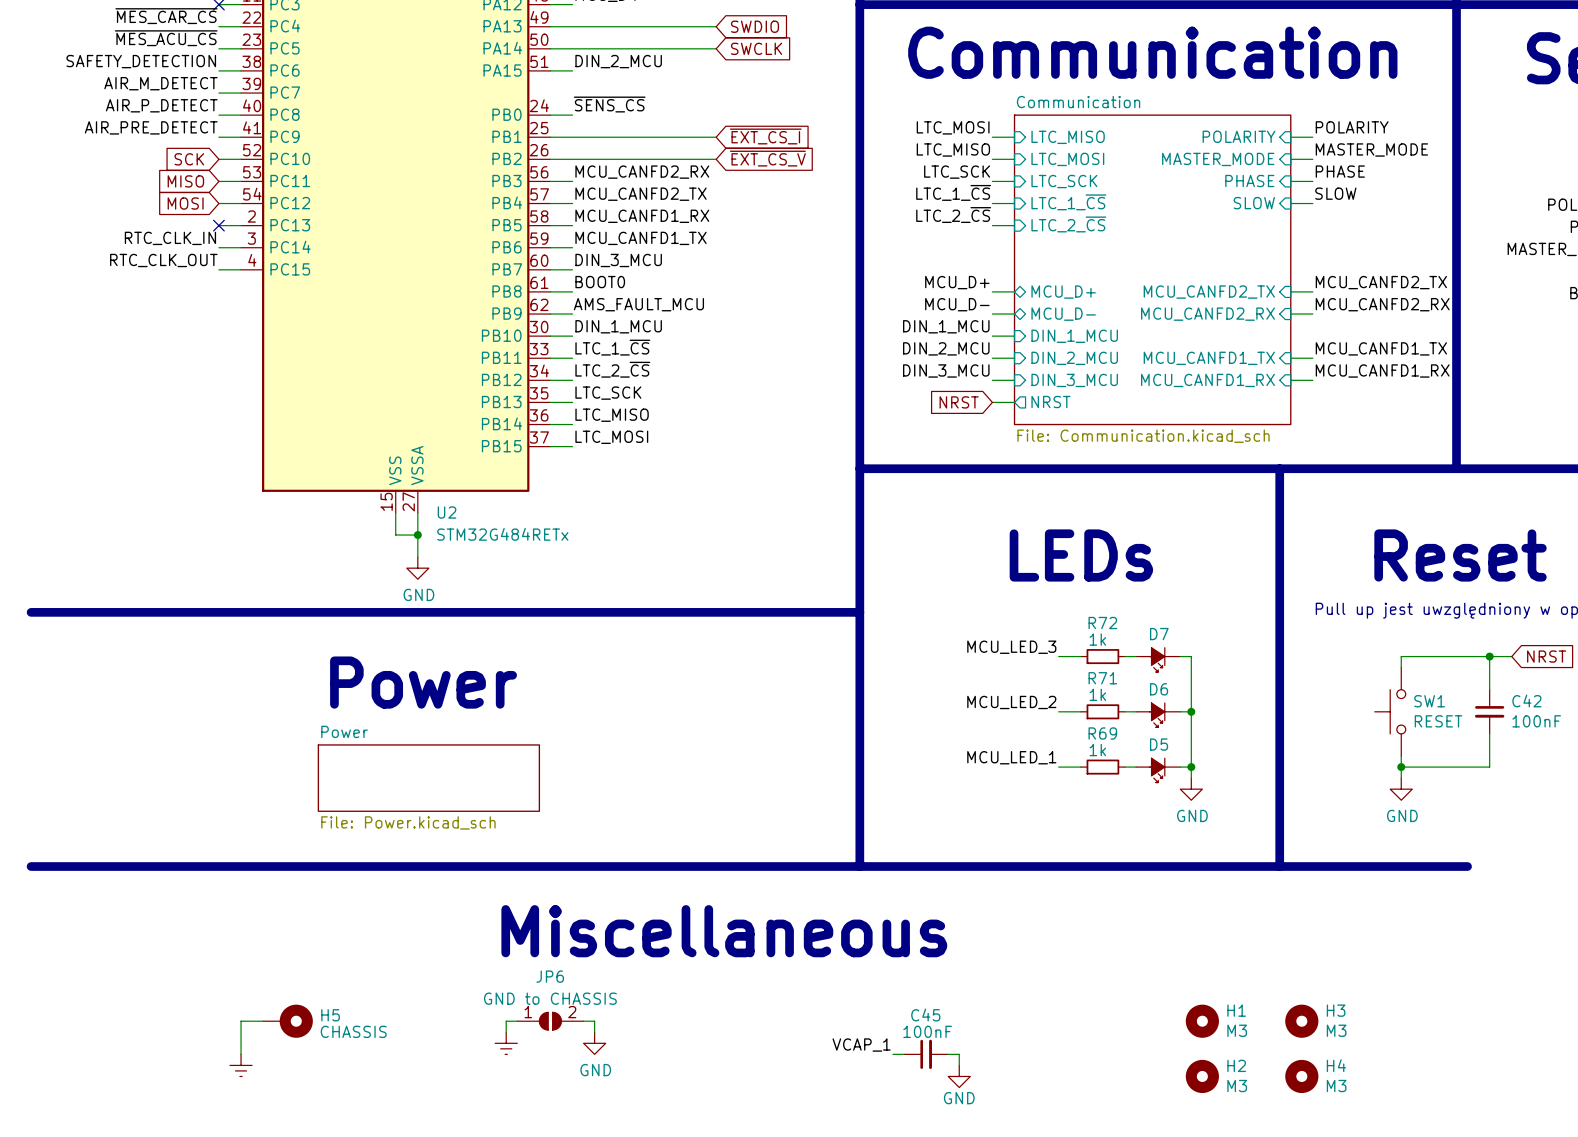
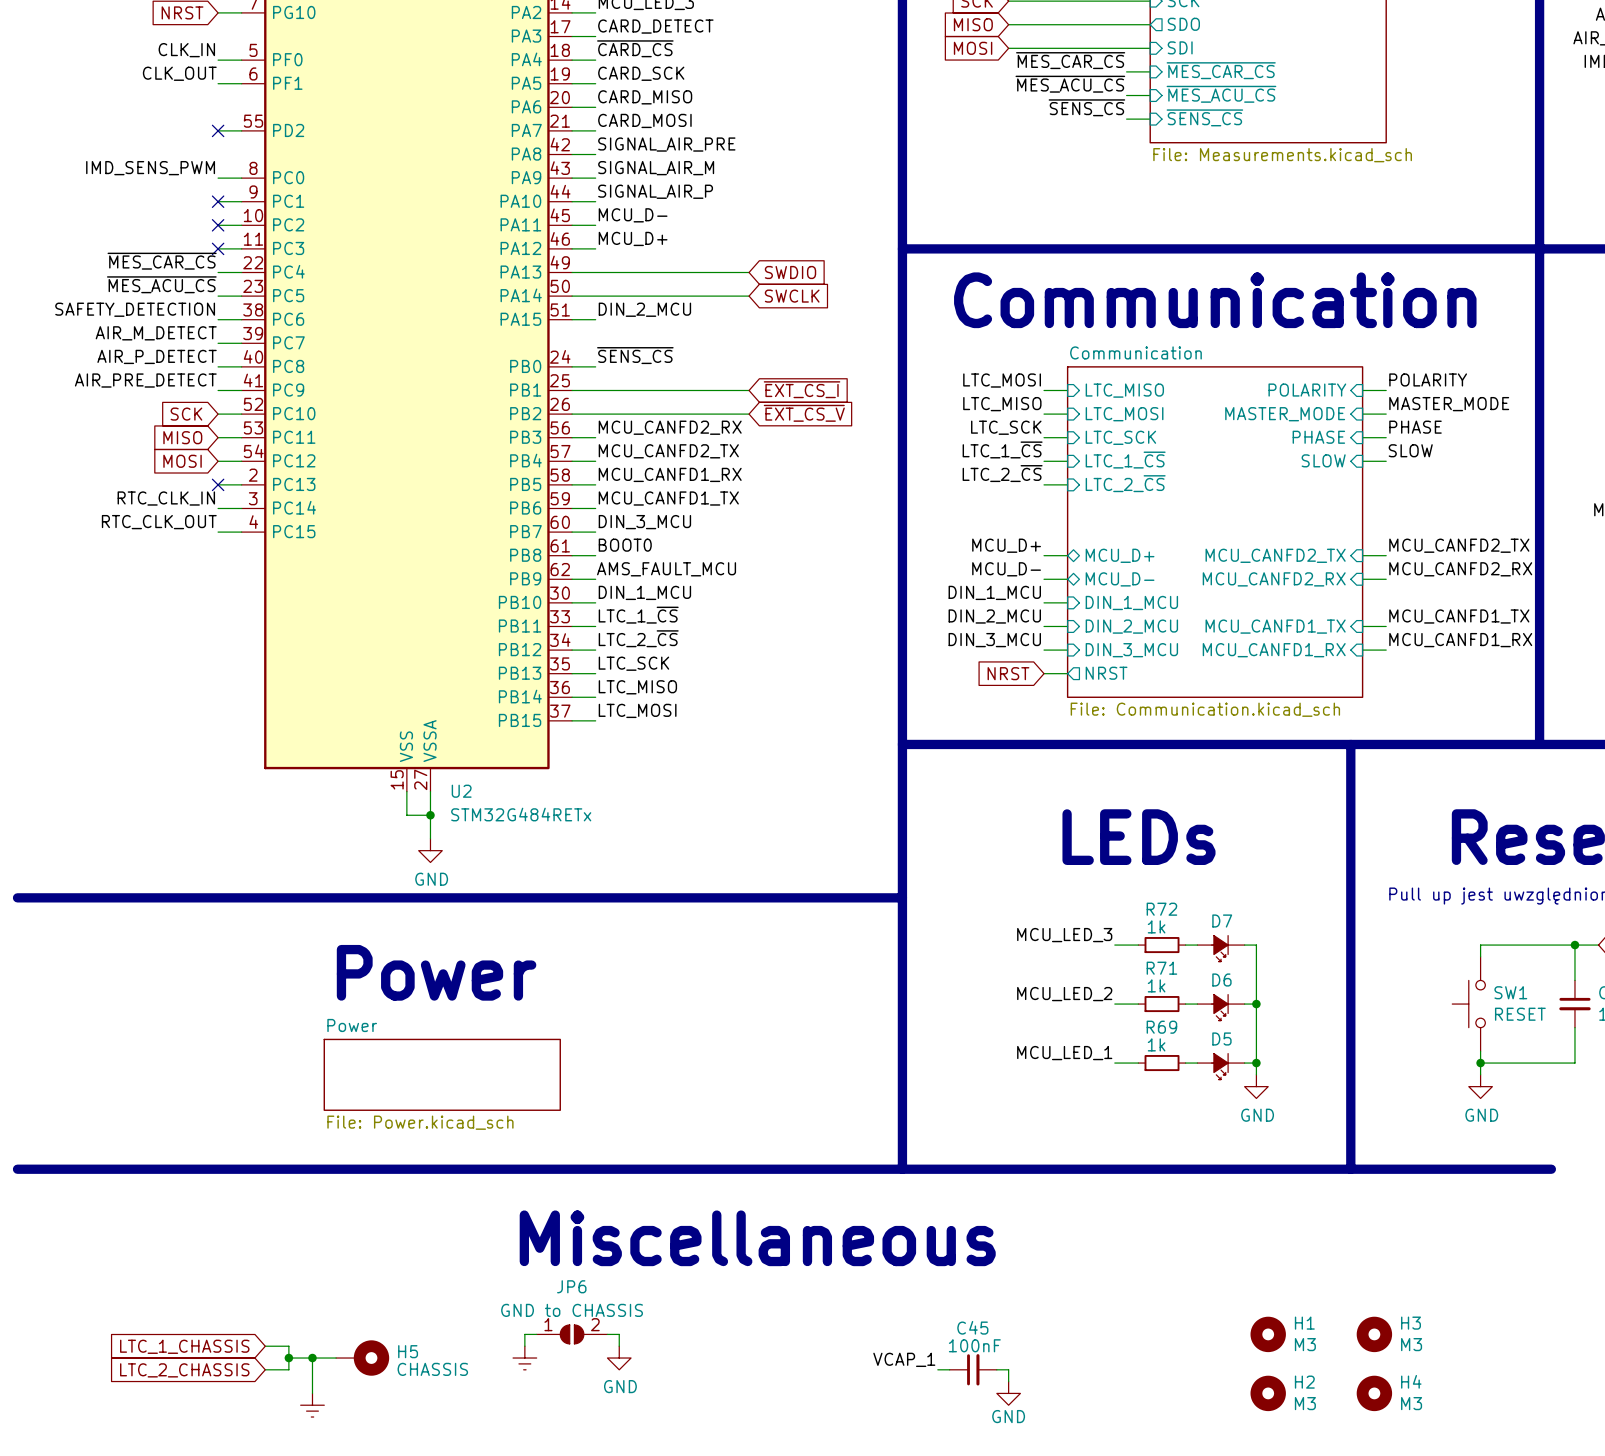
wire: (263, 1021) (241, 1021) (241, 1054) -> none
H5 position: (287, 1021) -> (362, 1358)
global label: none -> LTC_1_CHASSIS (184, 1346)
wire: none -> (265, 1346) (288, 1346) (288, 1369) (265, 1369)
wire: none -> (288, 1358) (336, 1358)
junction: none -> (288, 1358)
wire: none -> (312, 1358) (312, 1393)
junction: none -> (312, 1358)
global label: none -> LTC_2_CHASSIS (184, 1370)
power symbol position: (241, 1065) -> (312, 1405)

